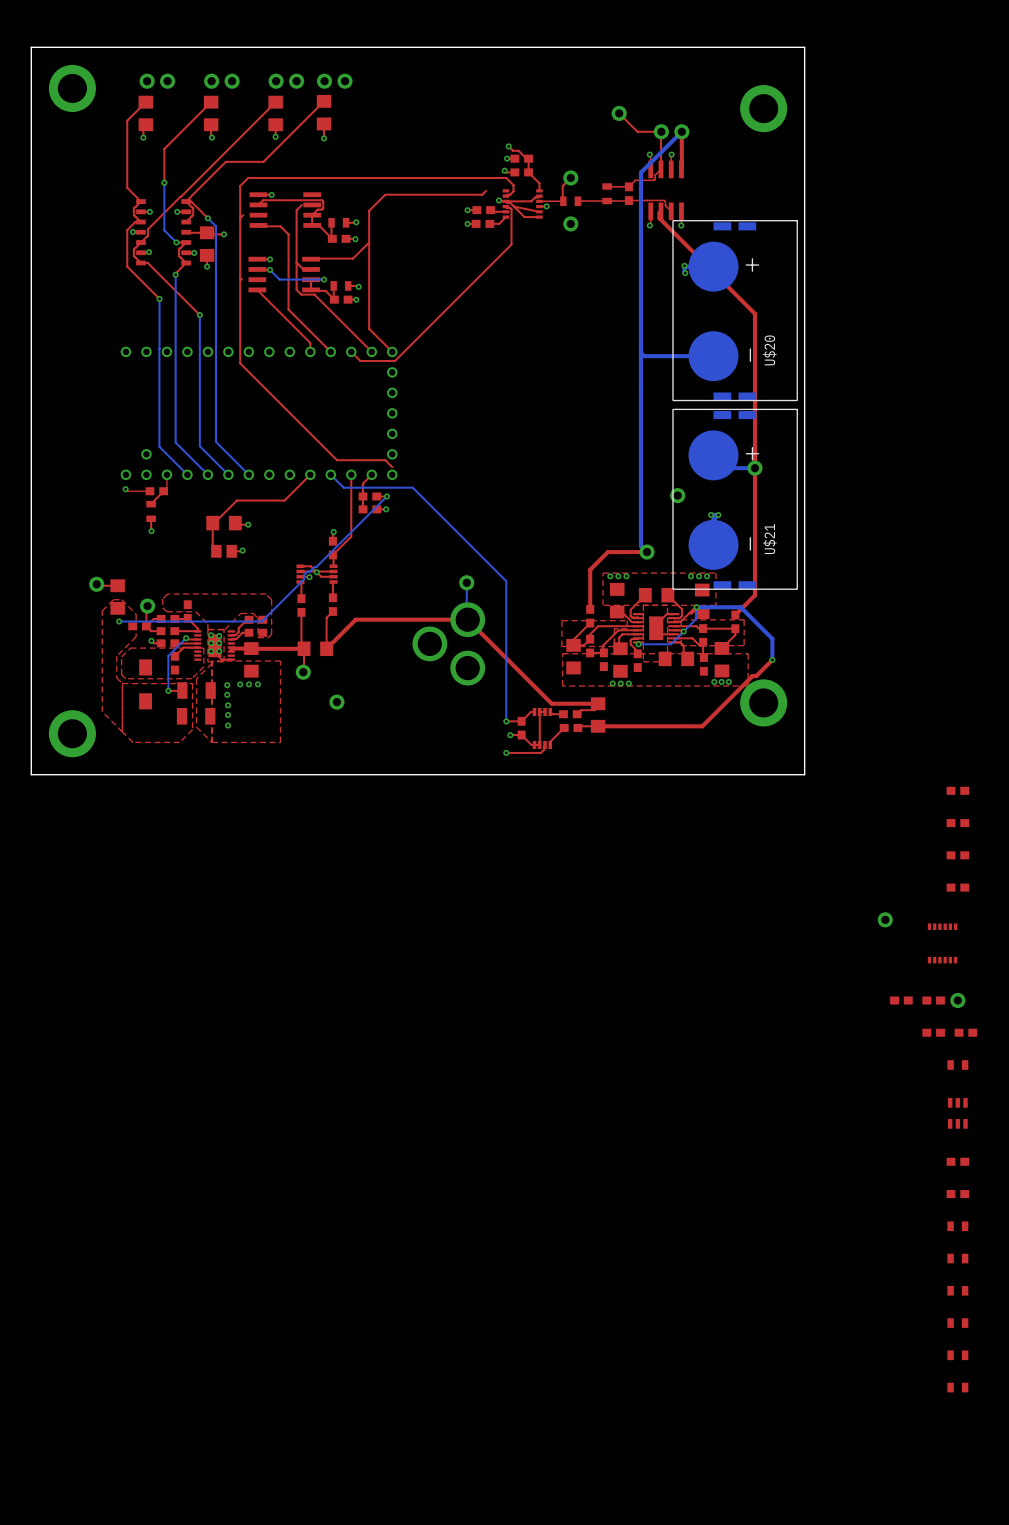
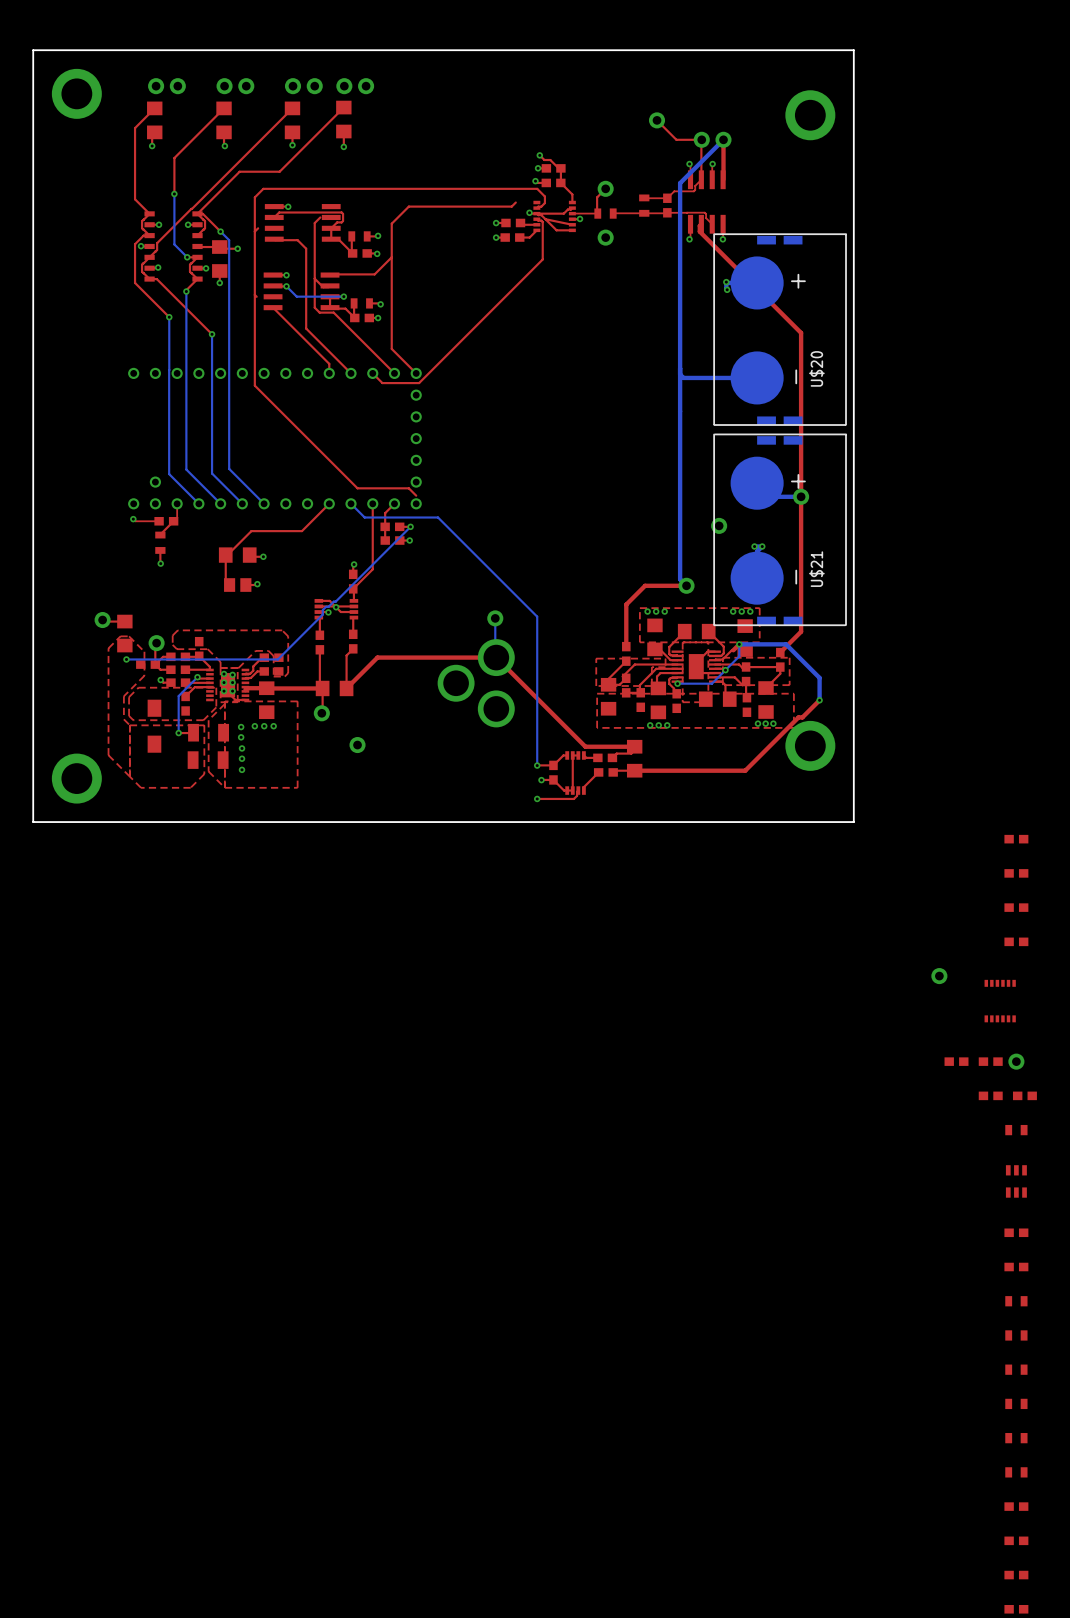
part: none -> (1016, 1506)
part: none -> (1016, 1540)
part: none -> (1016, 1575)
part: none -> (1016, 1609)

